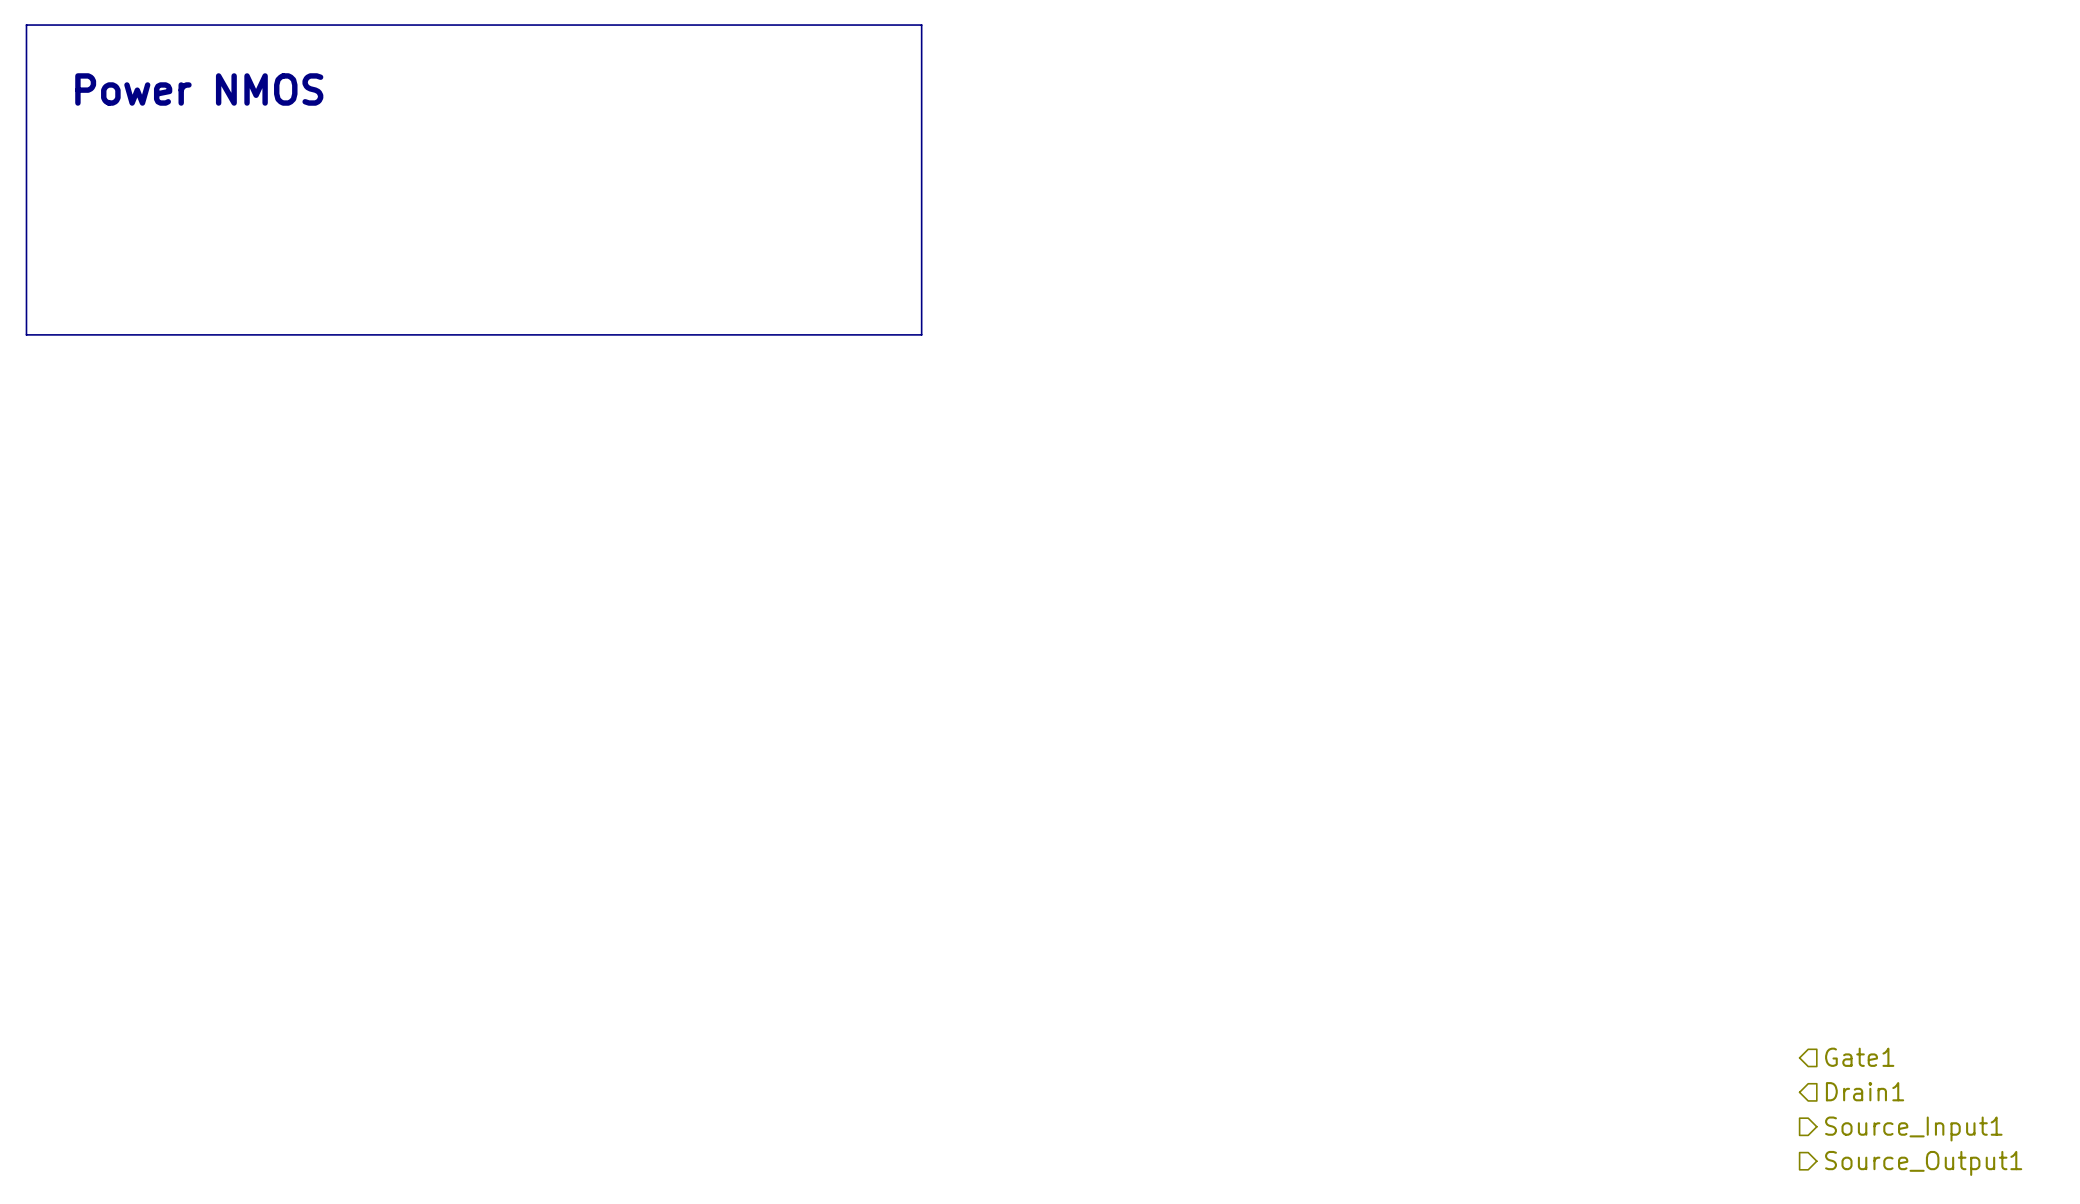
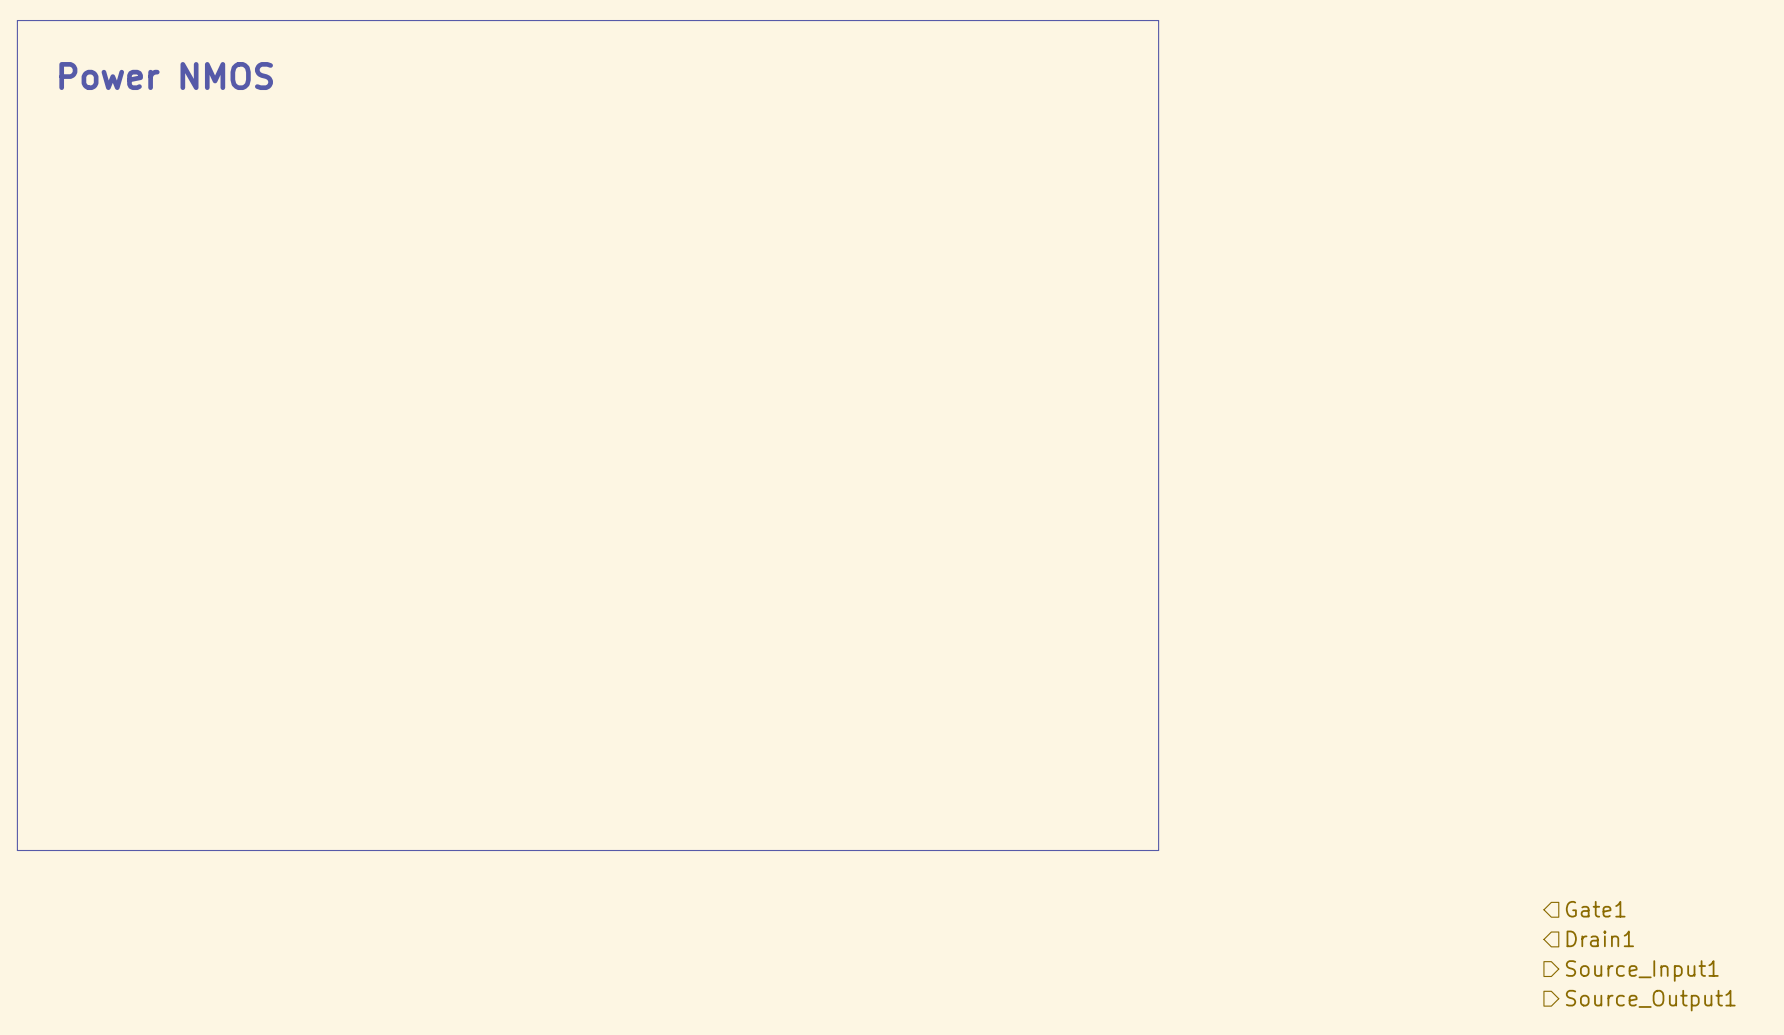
line: (921, 25) (921, 334) (26, 334) -> (788, 20) (1158, 20) (1158, 850) (17, 850) (17, 287)

